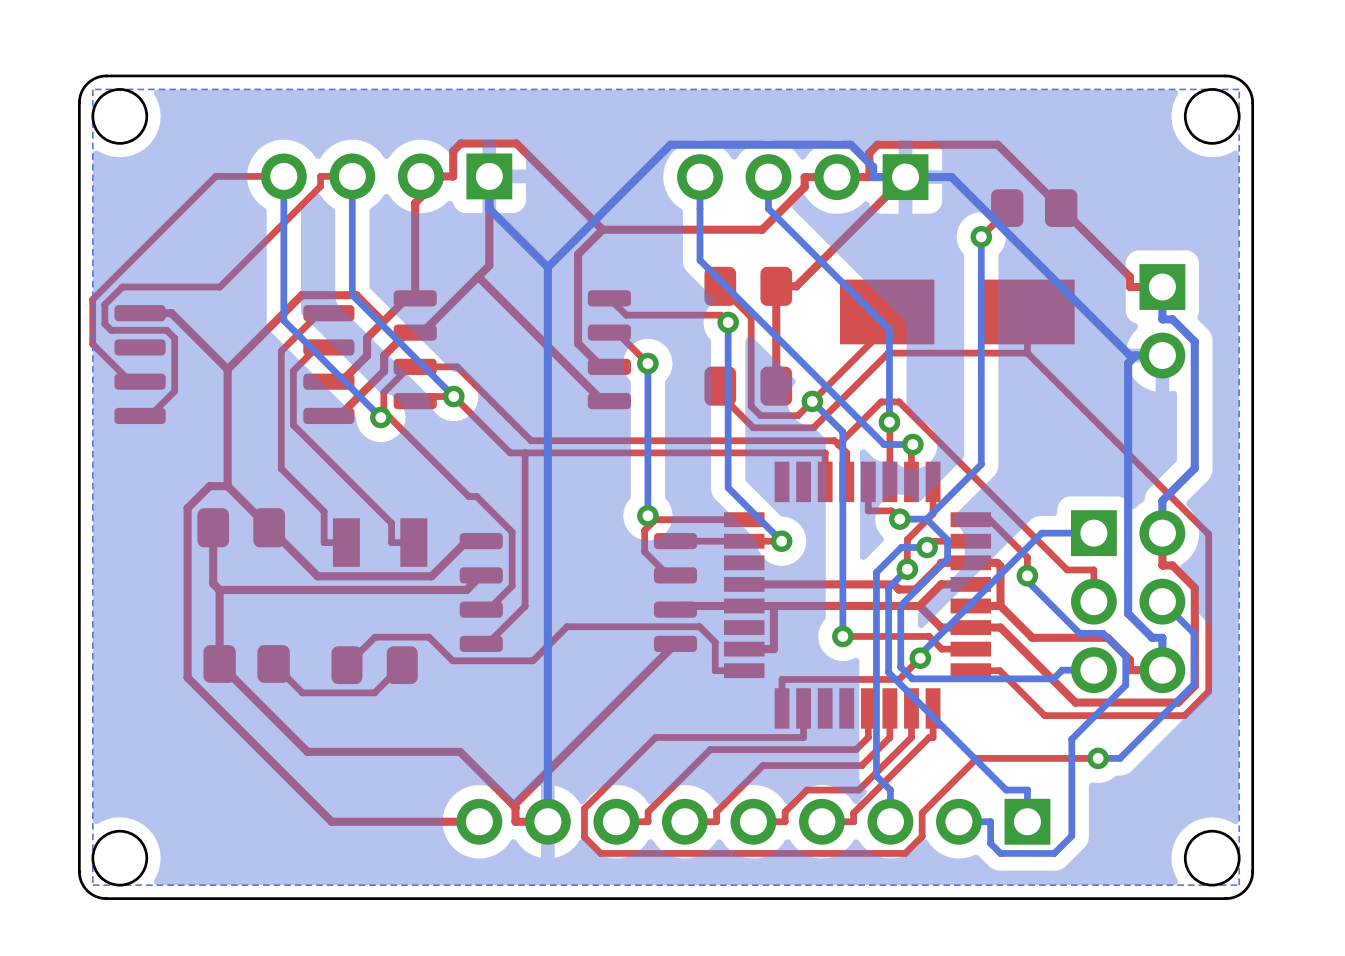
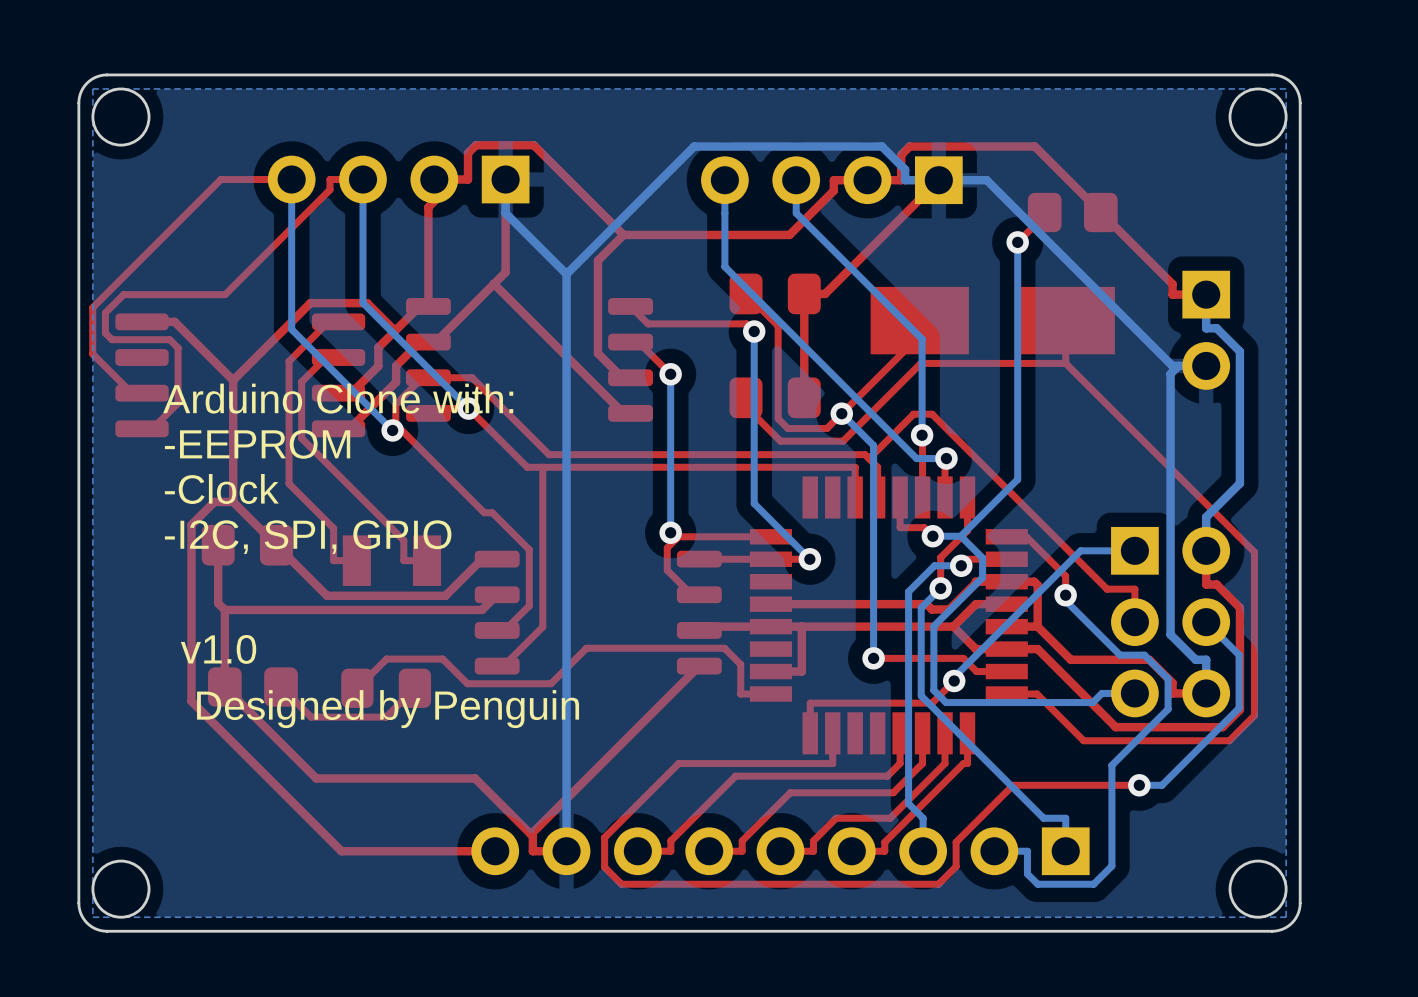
text: none -> Arduino Clone with: (338, 398)
text: none -> -EEPROM (257, 444)
text: none -> -Clock (221, 489)
text: none -> -I2C, SPI, GPIO (308, 537)
text: none -> v1.0 (218, 649)
text: none -> Designed by Penguin (388, 709)

